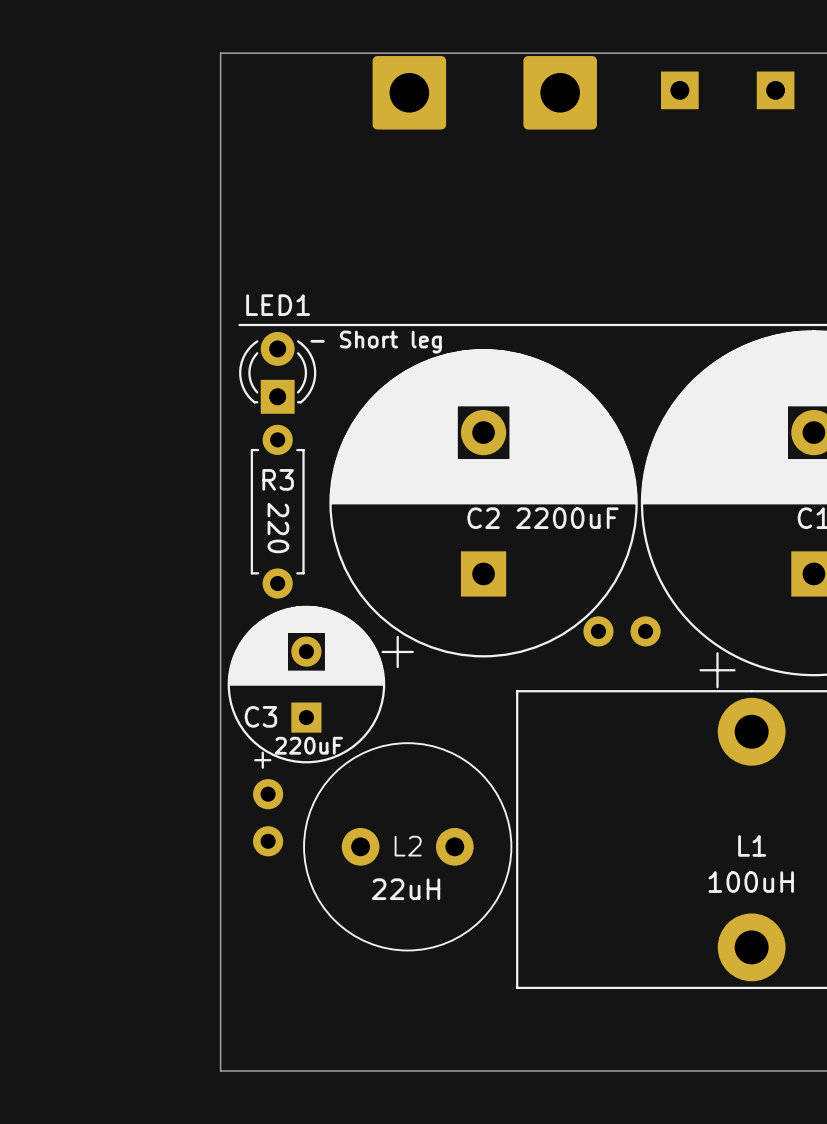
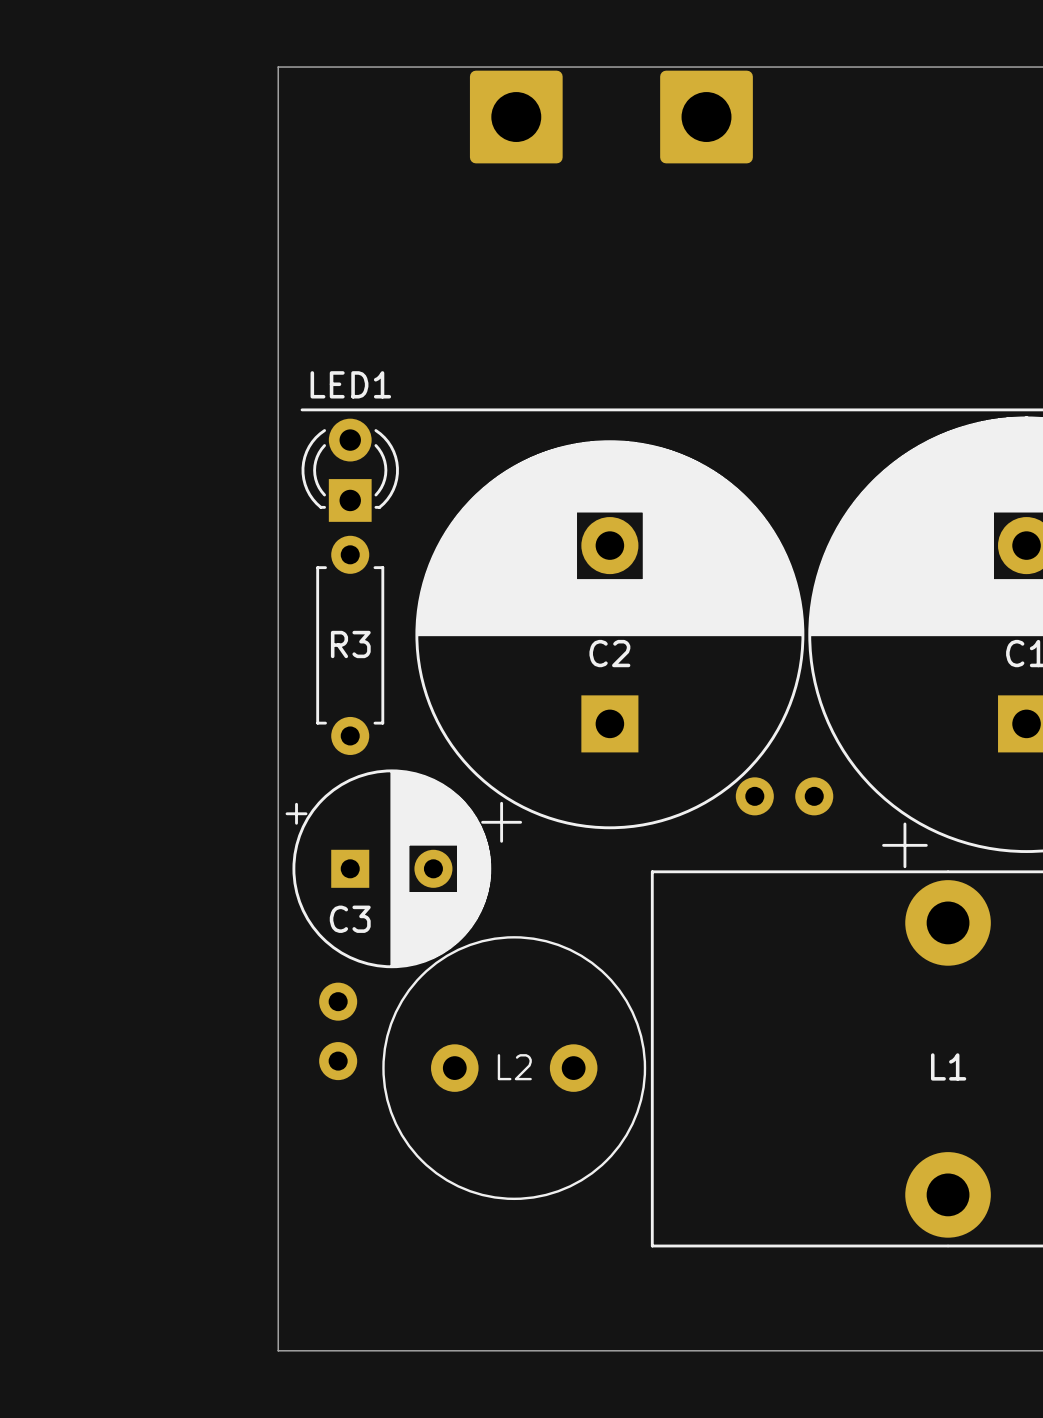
part: (679, 90) -> none
part: (775, 90) -> none
text: - Short leg (376, 342) -> none
R3 name position: R3 (278, 479) -> R3 (350, 644)
C2 value: 2200uF (567, 518) -> none
R3 value: 220 (278, 528) -> none
C3 rotation: 0° (306, 687) -> 90° clockwise (388, 868)
C3 value: 220uF (308, 745) -> none
L1 value: 100uH (751, 882) -> none
L2 value: 22uH (406, 889) -> none

